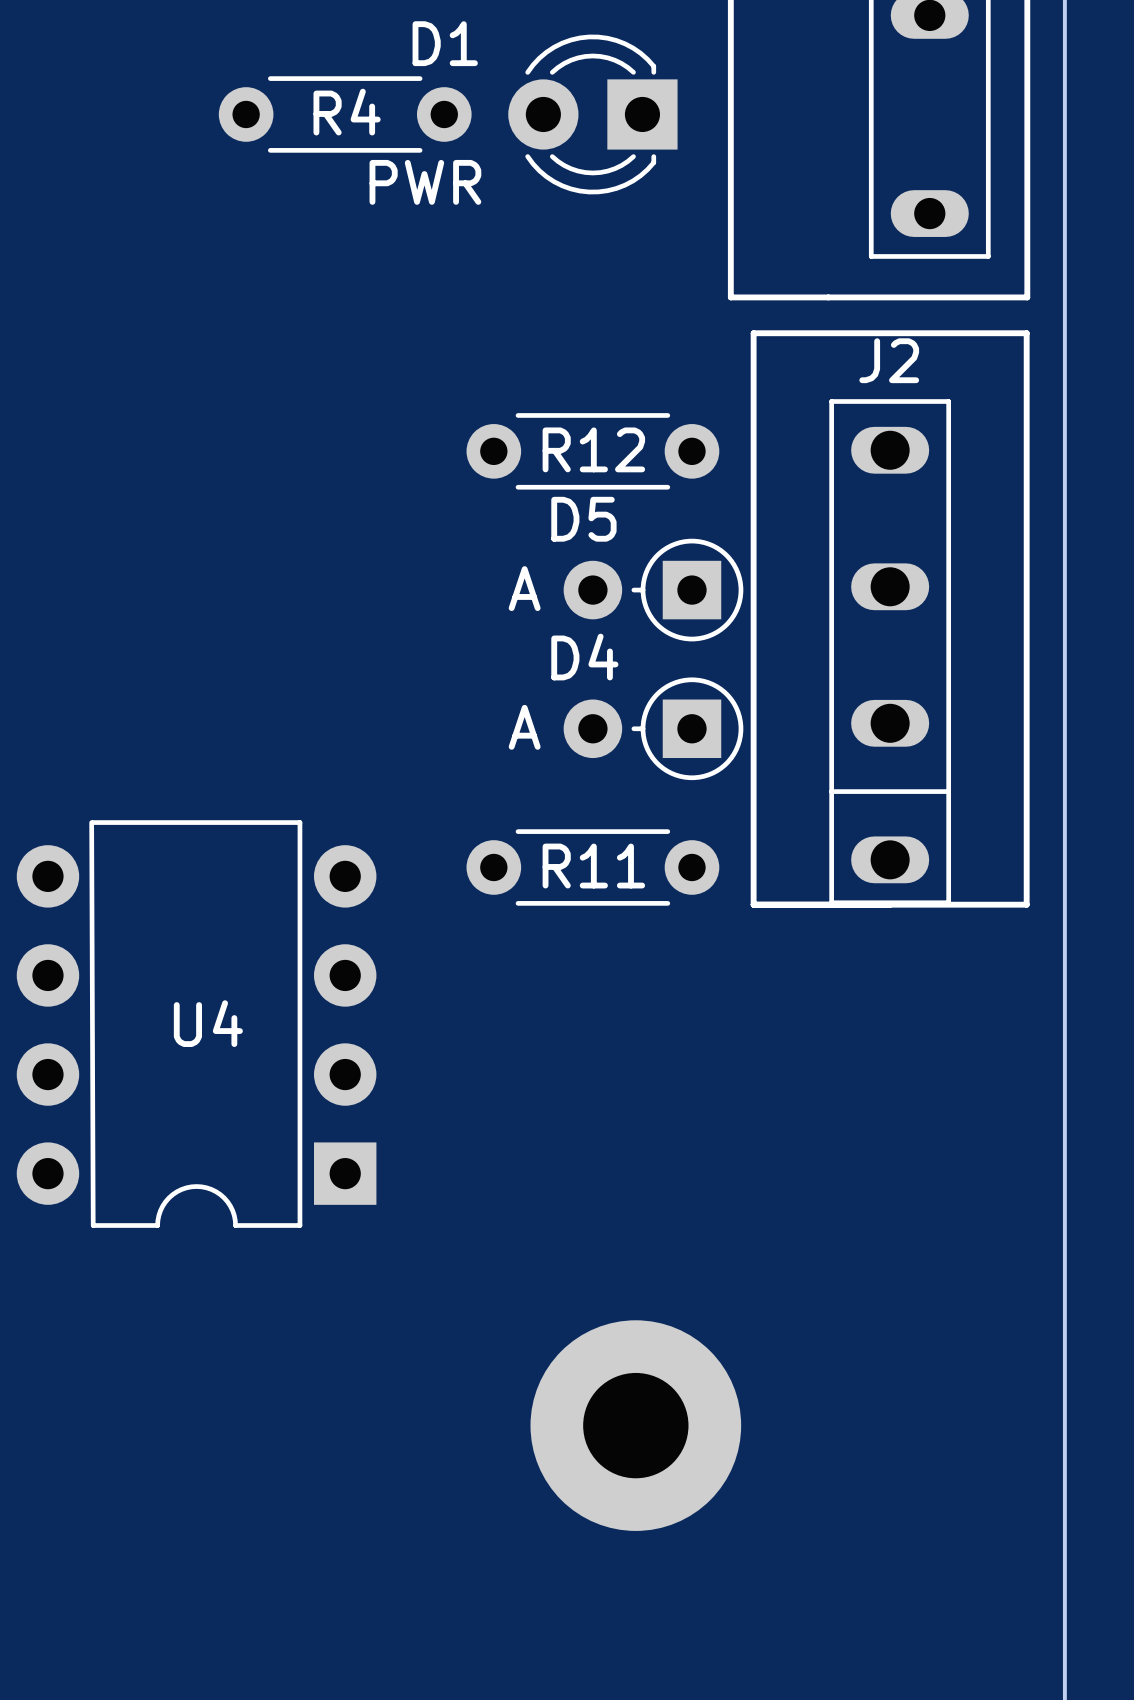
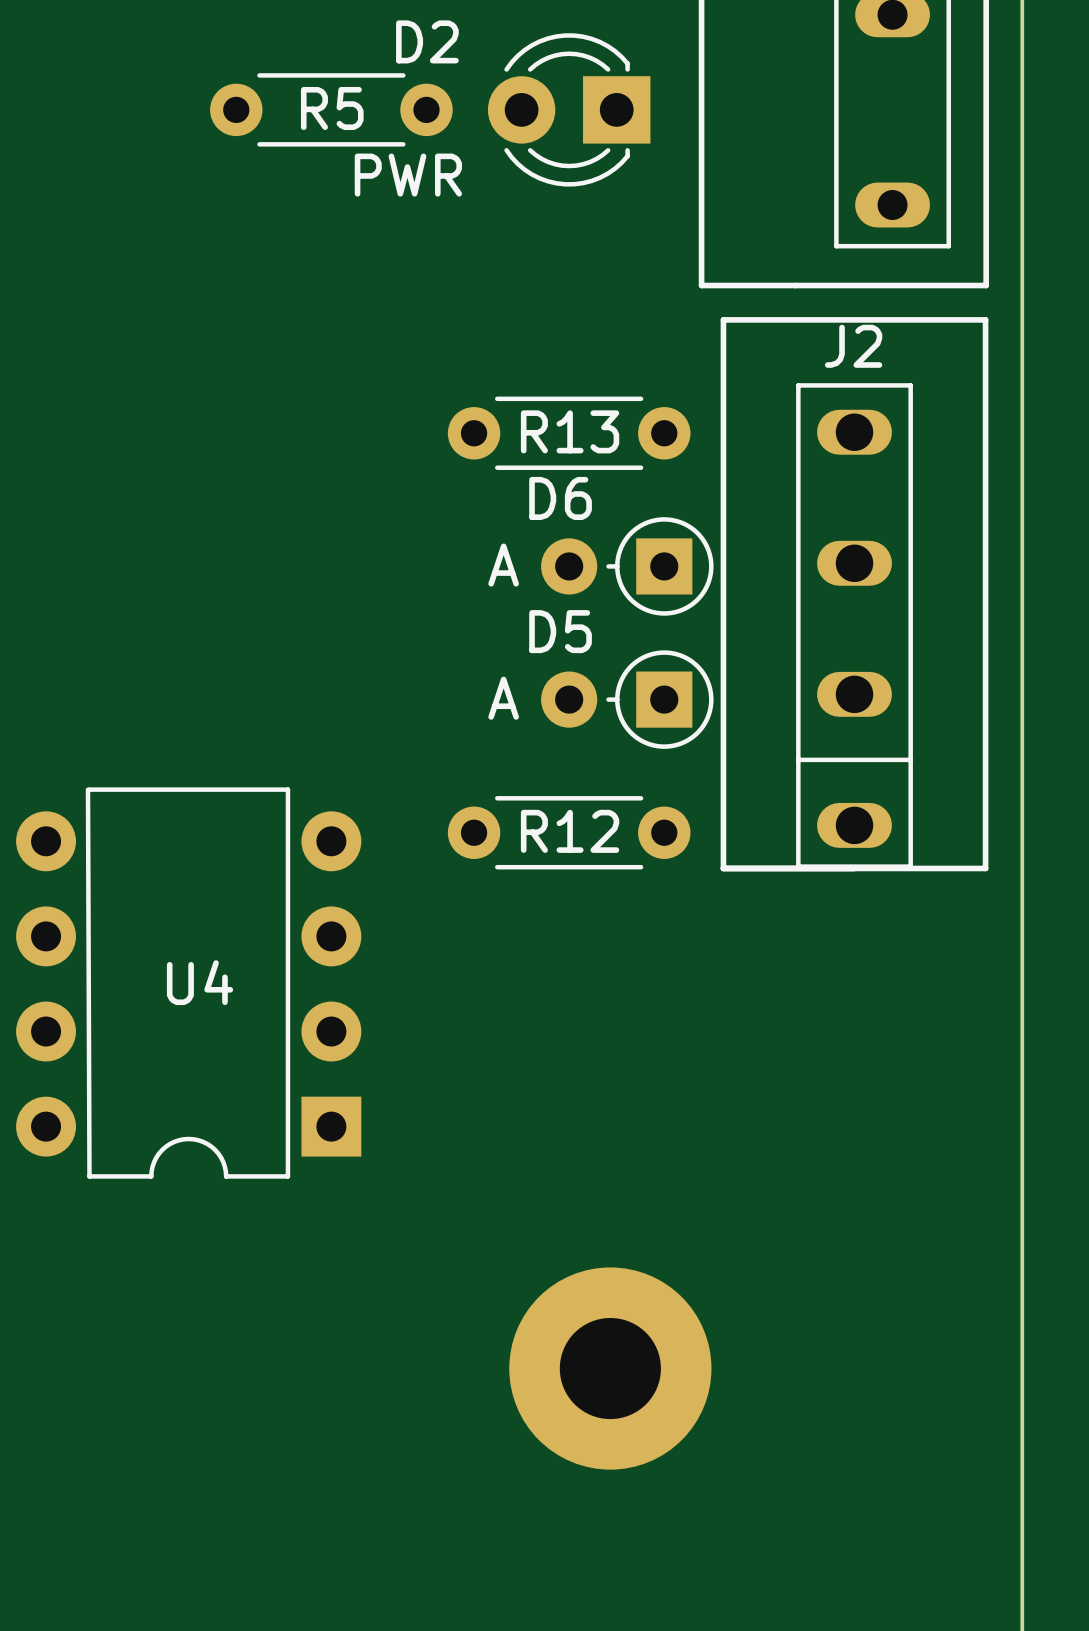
D1 name: D1 (445, 43) -> D2 (427, 41)
R4 name: R4 (347, 112) -> R5 (332, 108)
R12 name: R12 (593, 449) -> R13 (570, 431)
D5 name: D5 (583, 519) -> D6 (560, 498)
D4 name: D4 (584, 657) -> D5 (560, 631)
R11 name: R11 (593, 866) -> R12 (570, 831)

